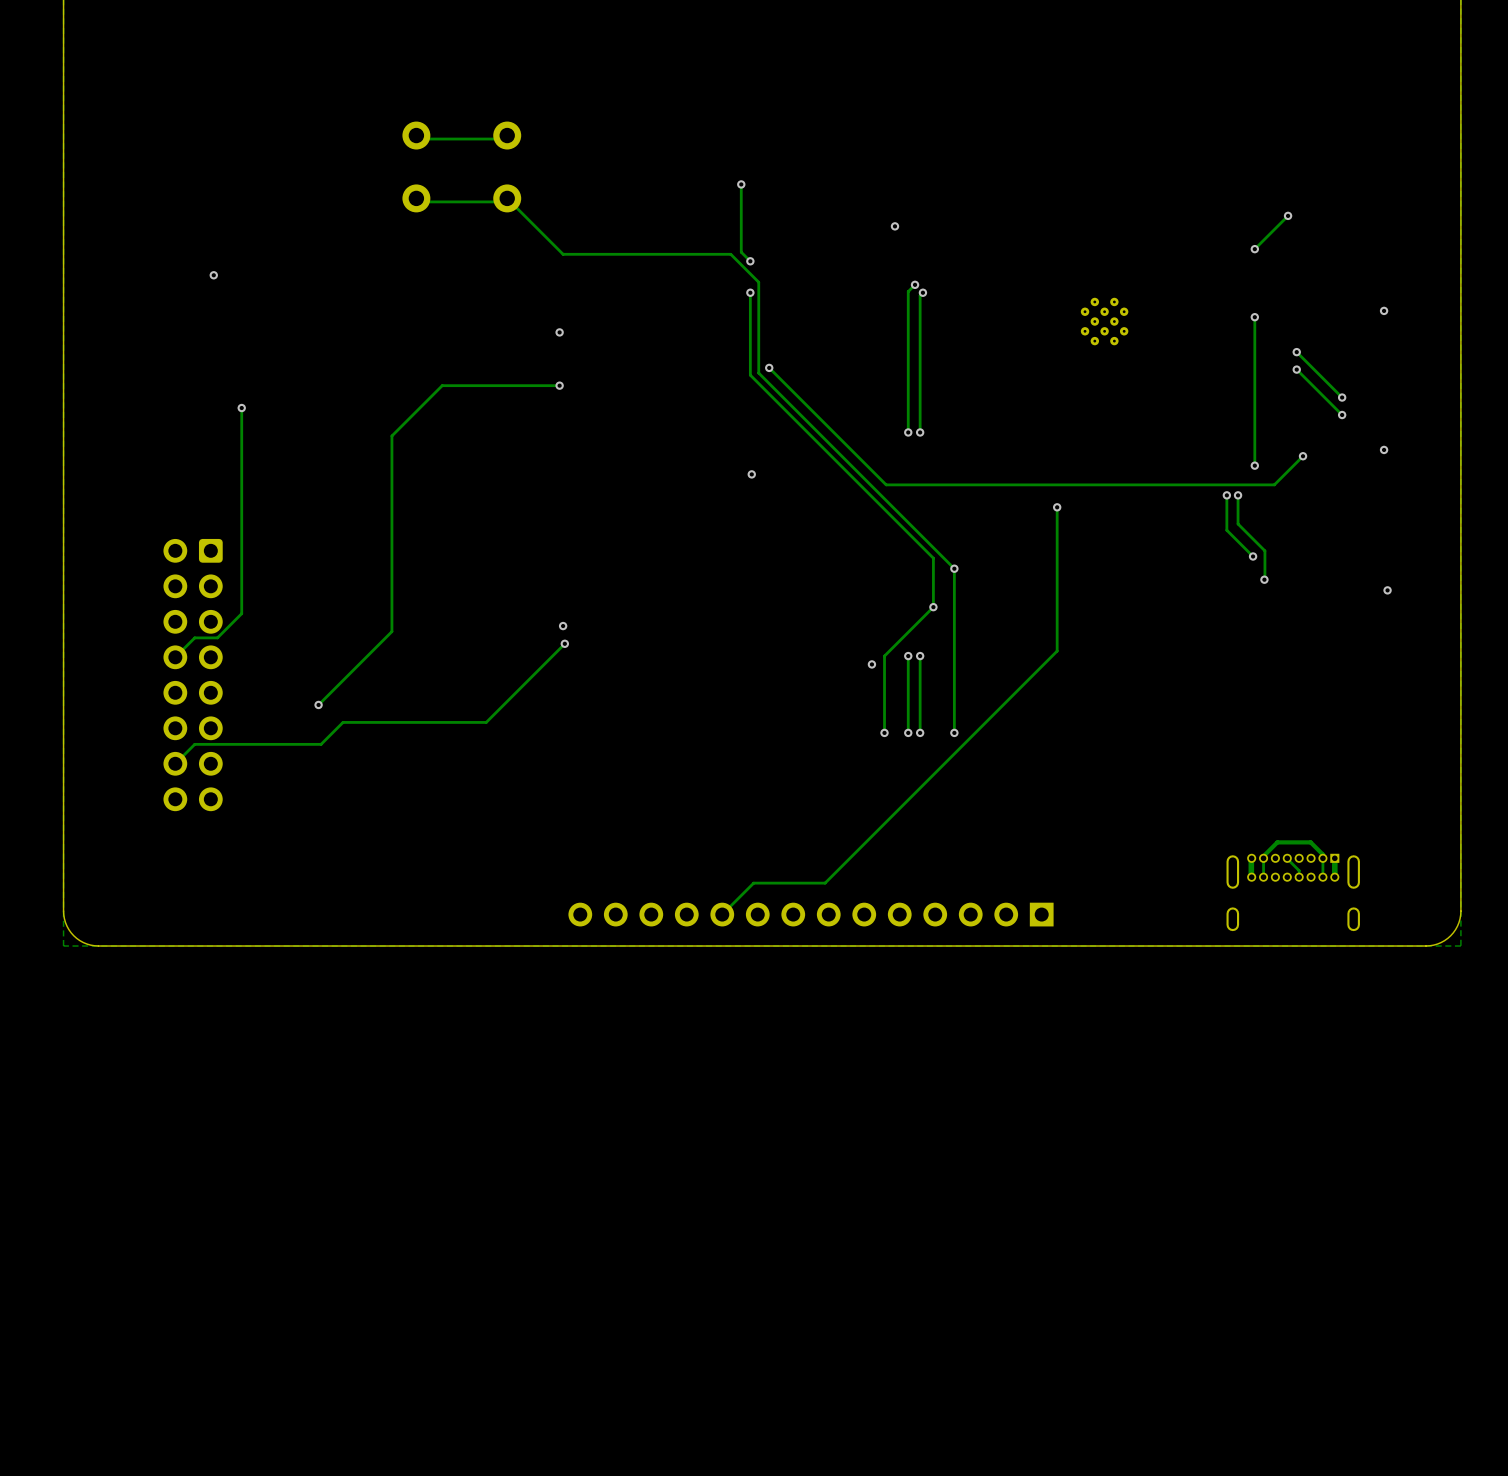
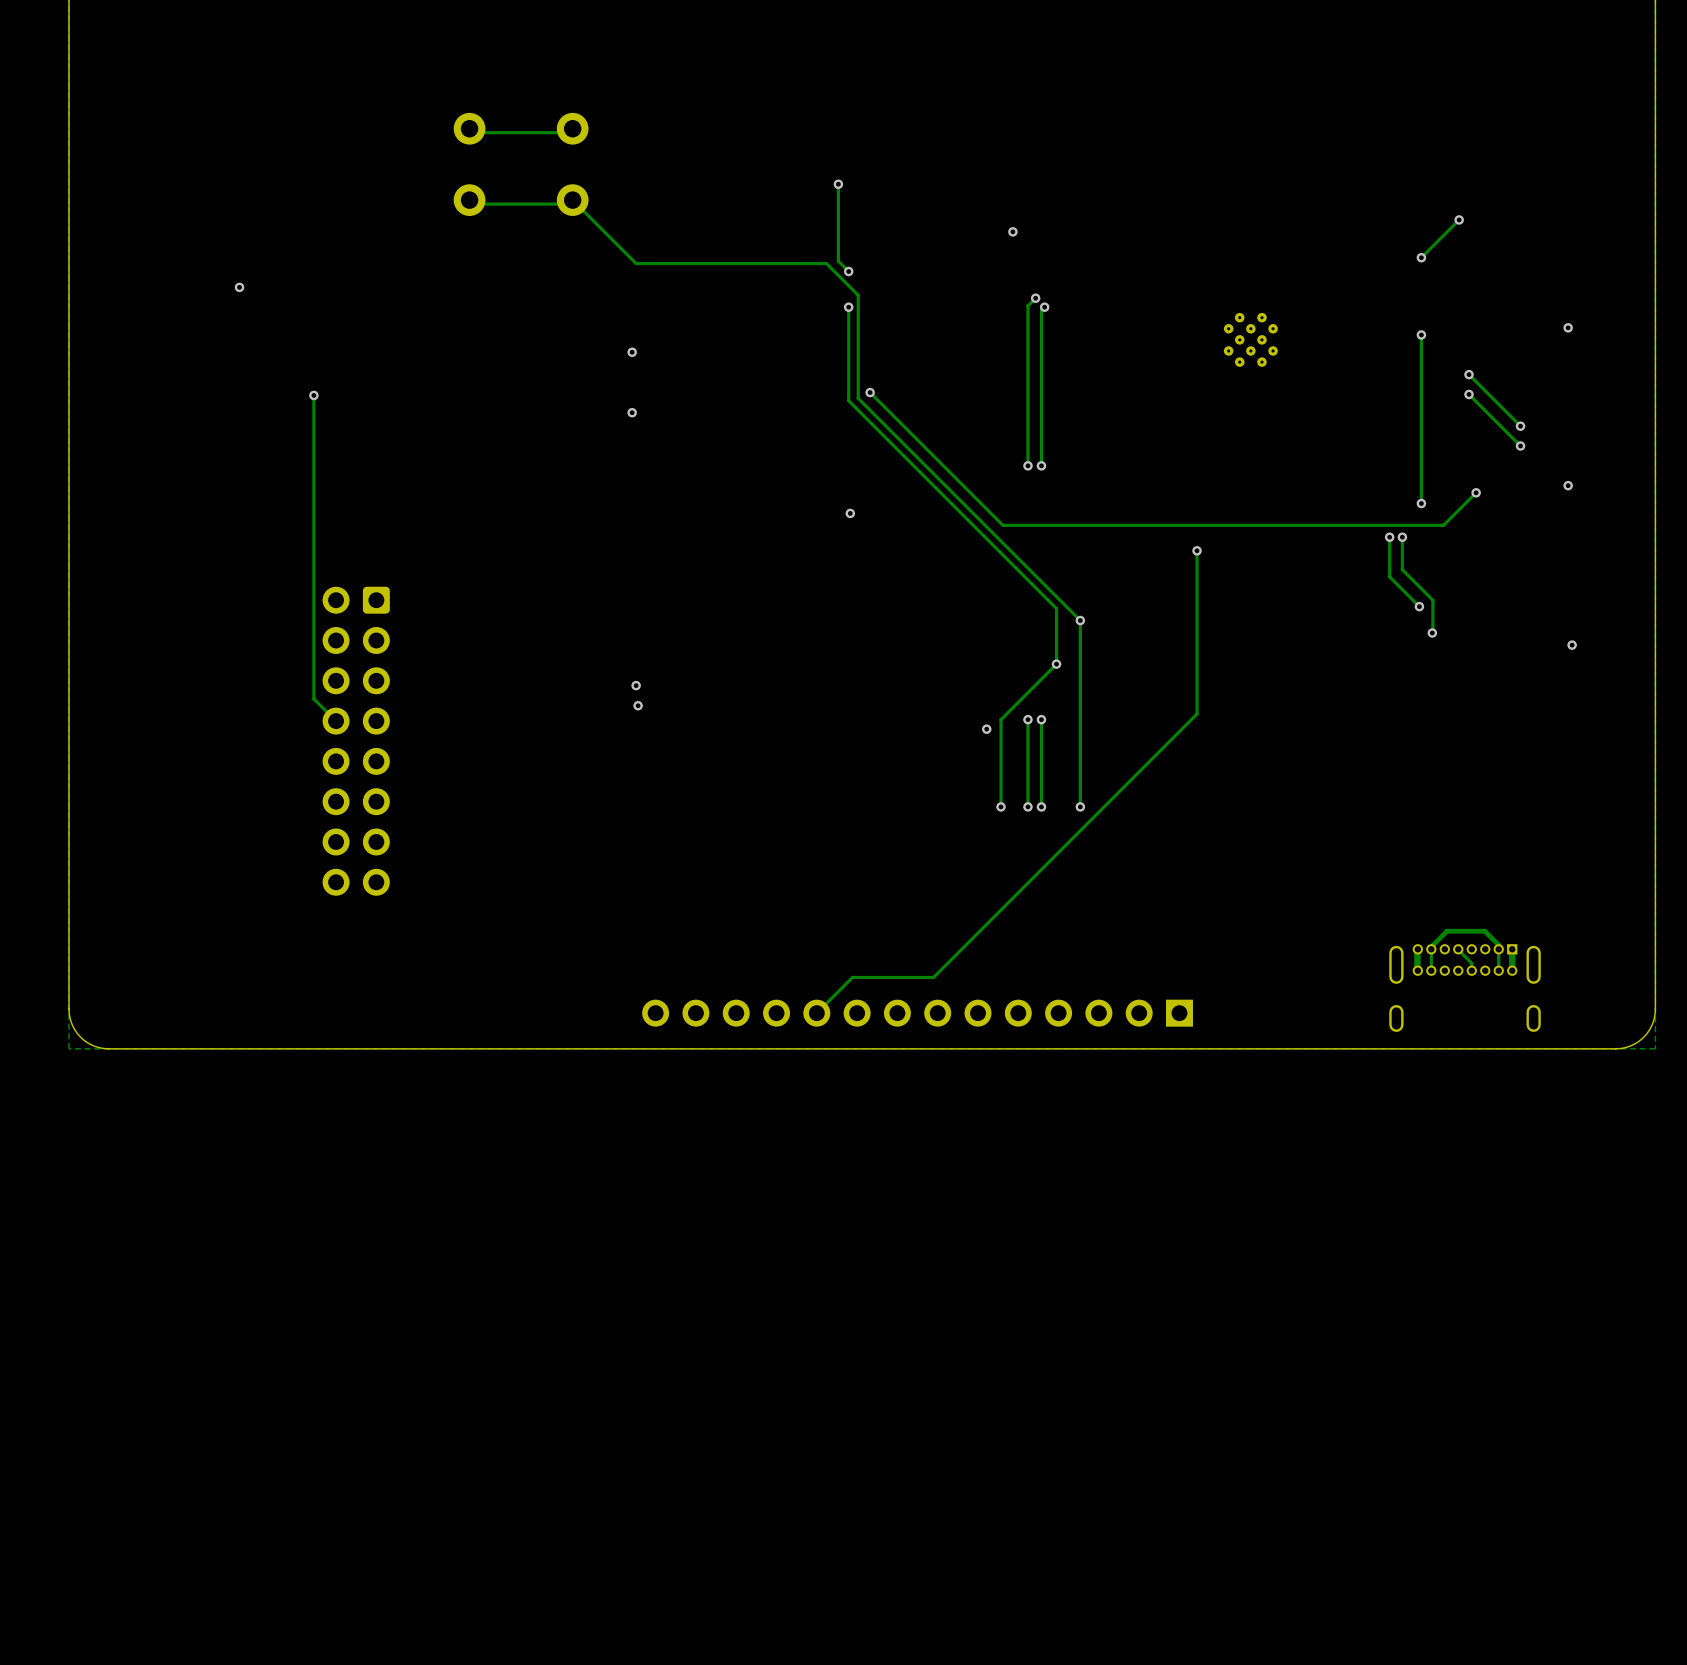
track: none -> (313, 395) (313, 698) (336, 721)
track: (559, 385) (442, 385) (391, 435) (391, 631) (318, 704) -> none
track: (241, 408) (241, 613) (217, 637) (194, 637) (175, 657) -> none
via position: (241, 408) -> (313, 395)
track: (564, 643) (486, 722) (343, 722) (321, 744) (194, 744) (175, 763) -> none
part position: (193, 675) -> (356, 741)
via: (318, 704) -> none

